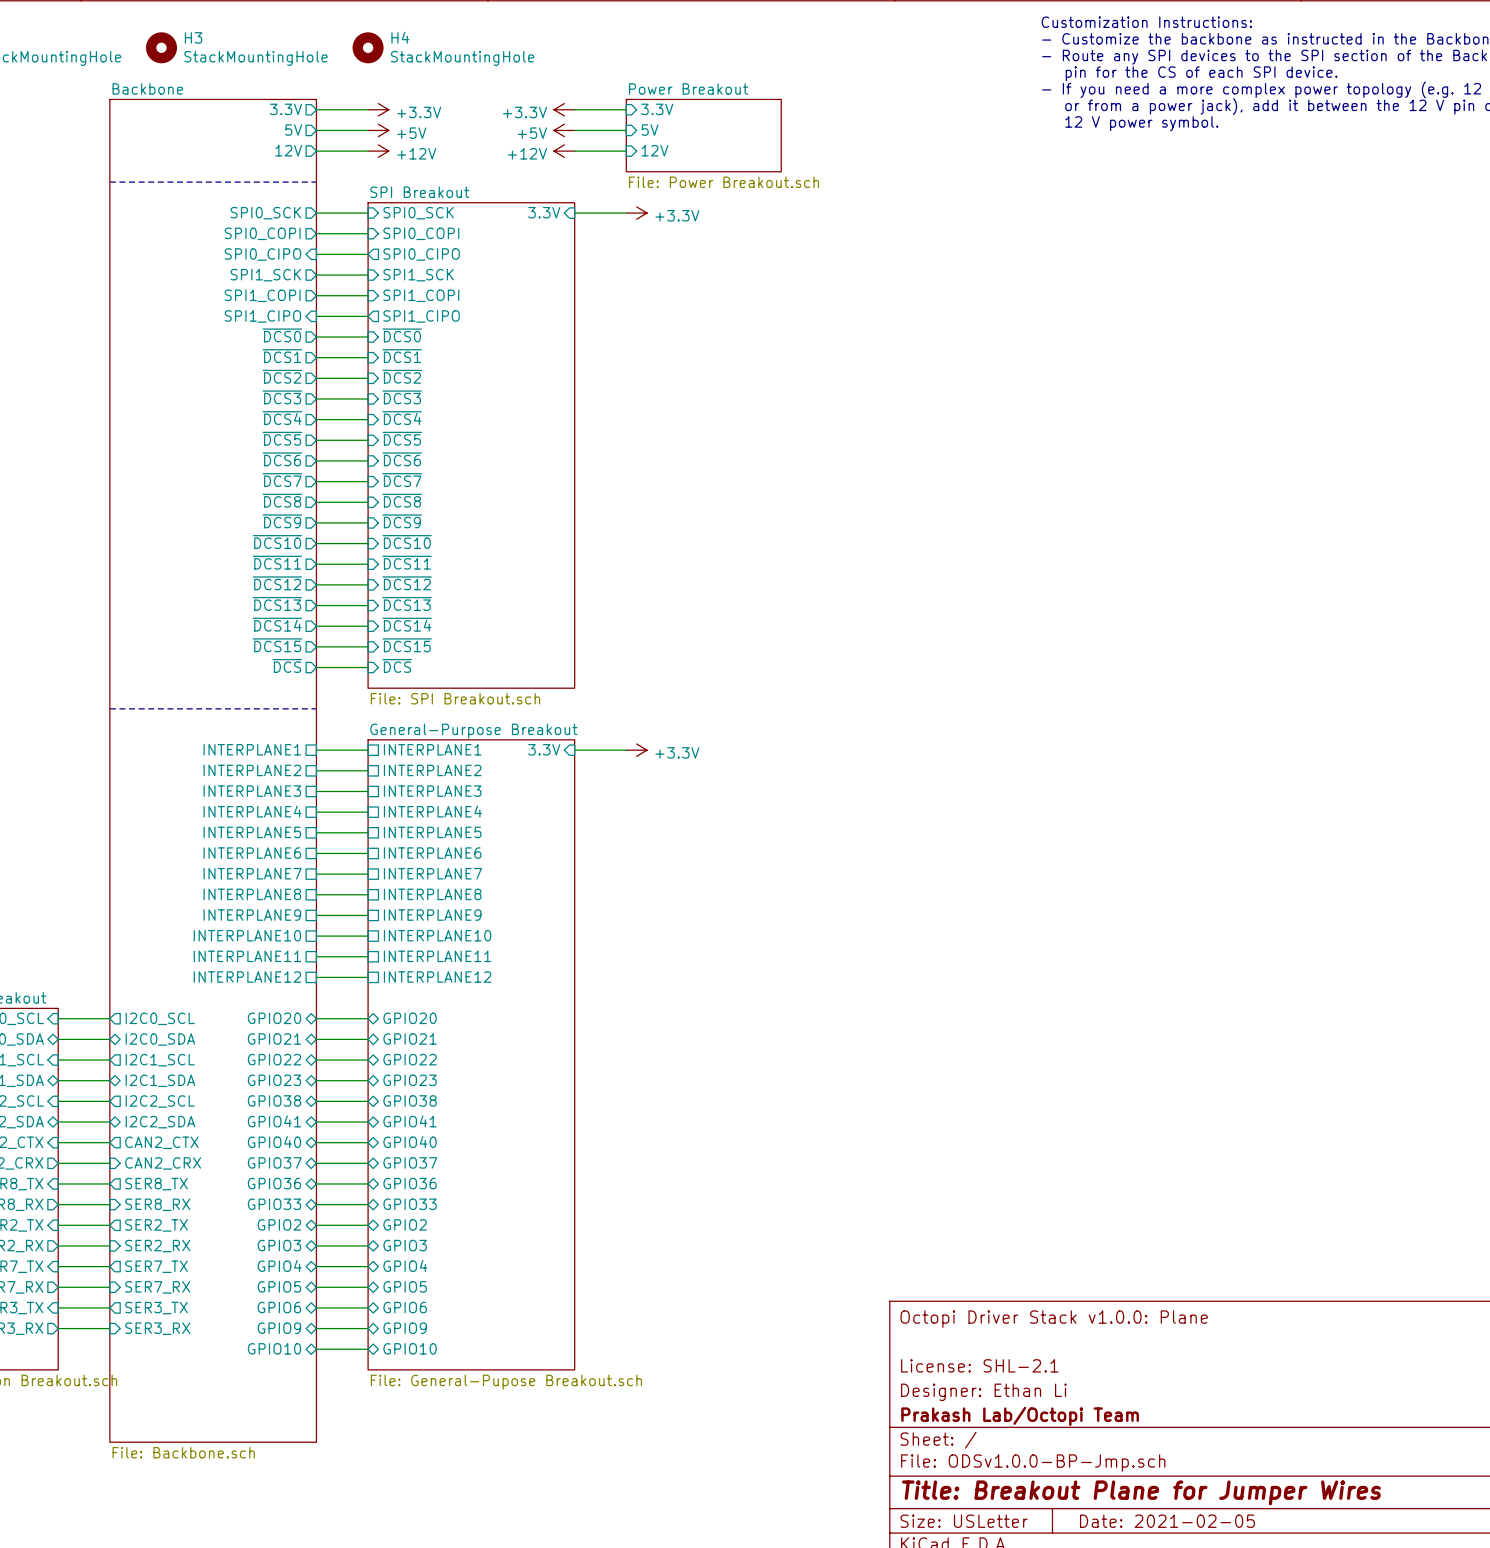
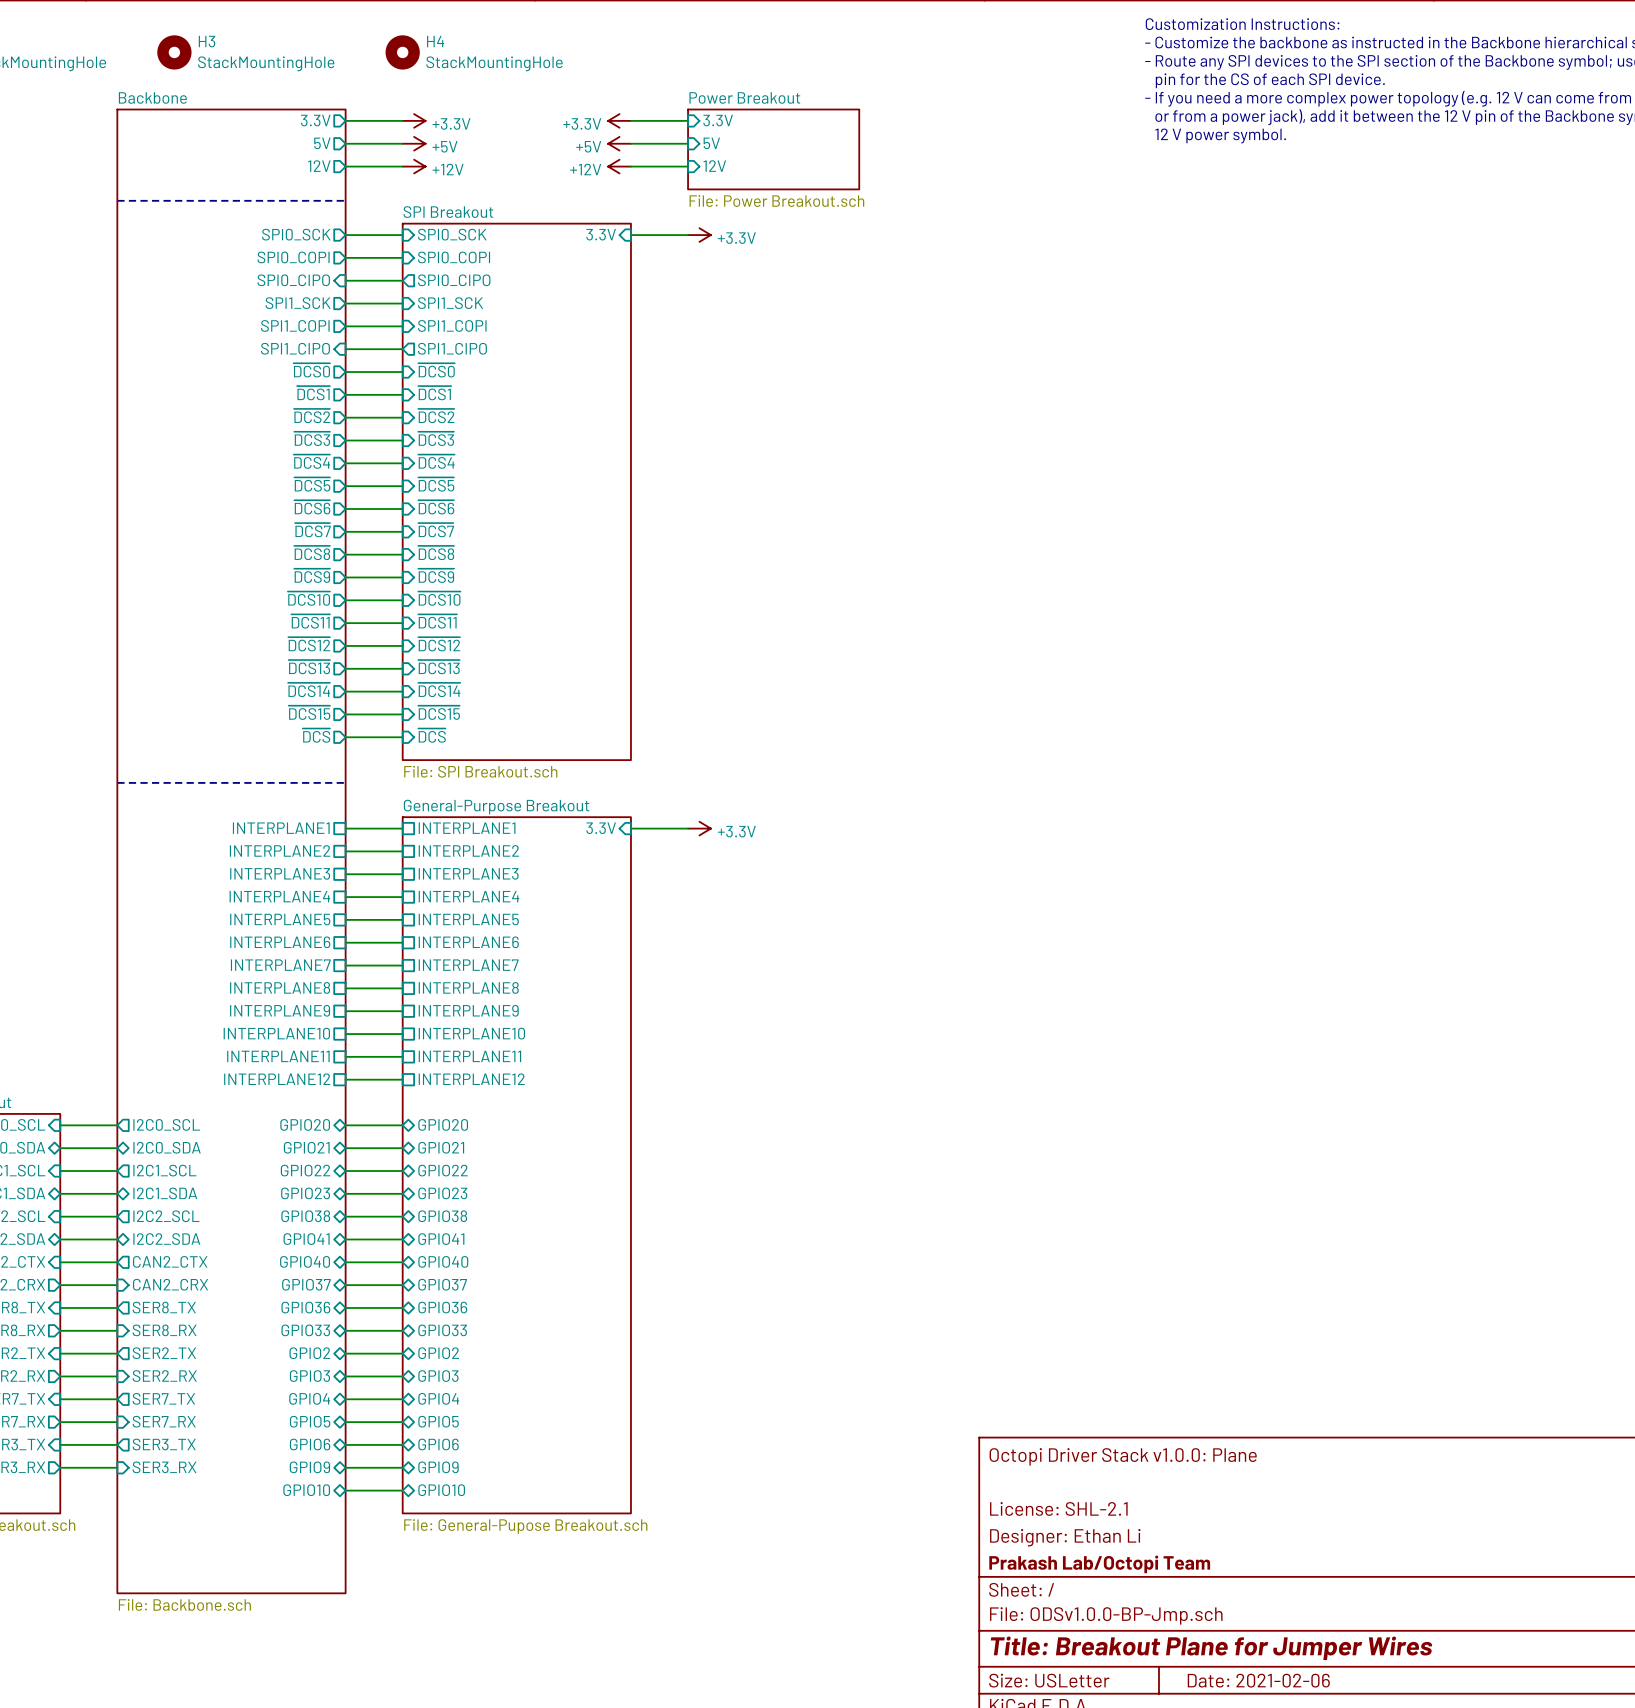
title block: Date: 2021-02-05 (1167, 1521) -> Date: 2021-02-06 (1258, 1680)

